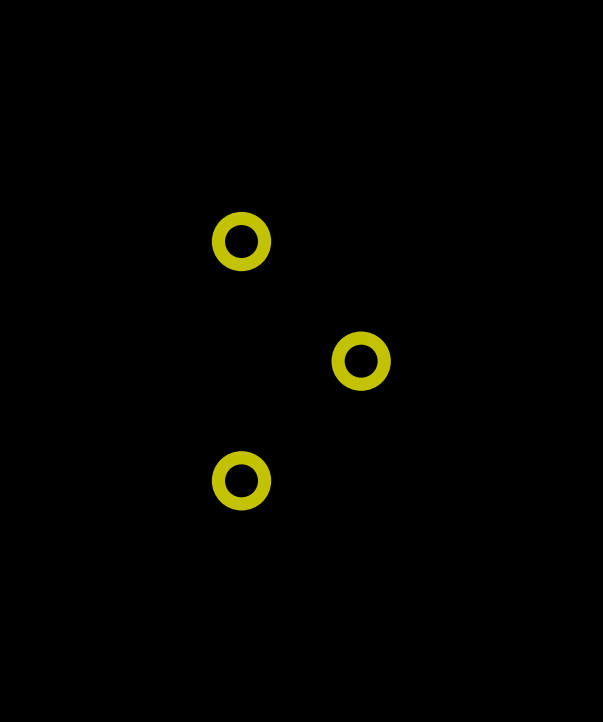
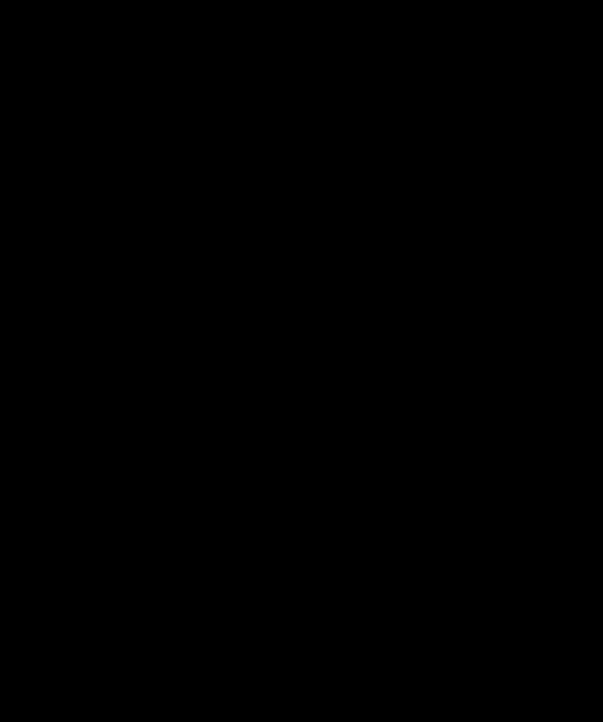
part: (301, 361) -> none

